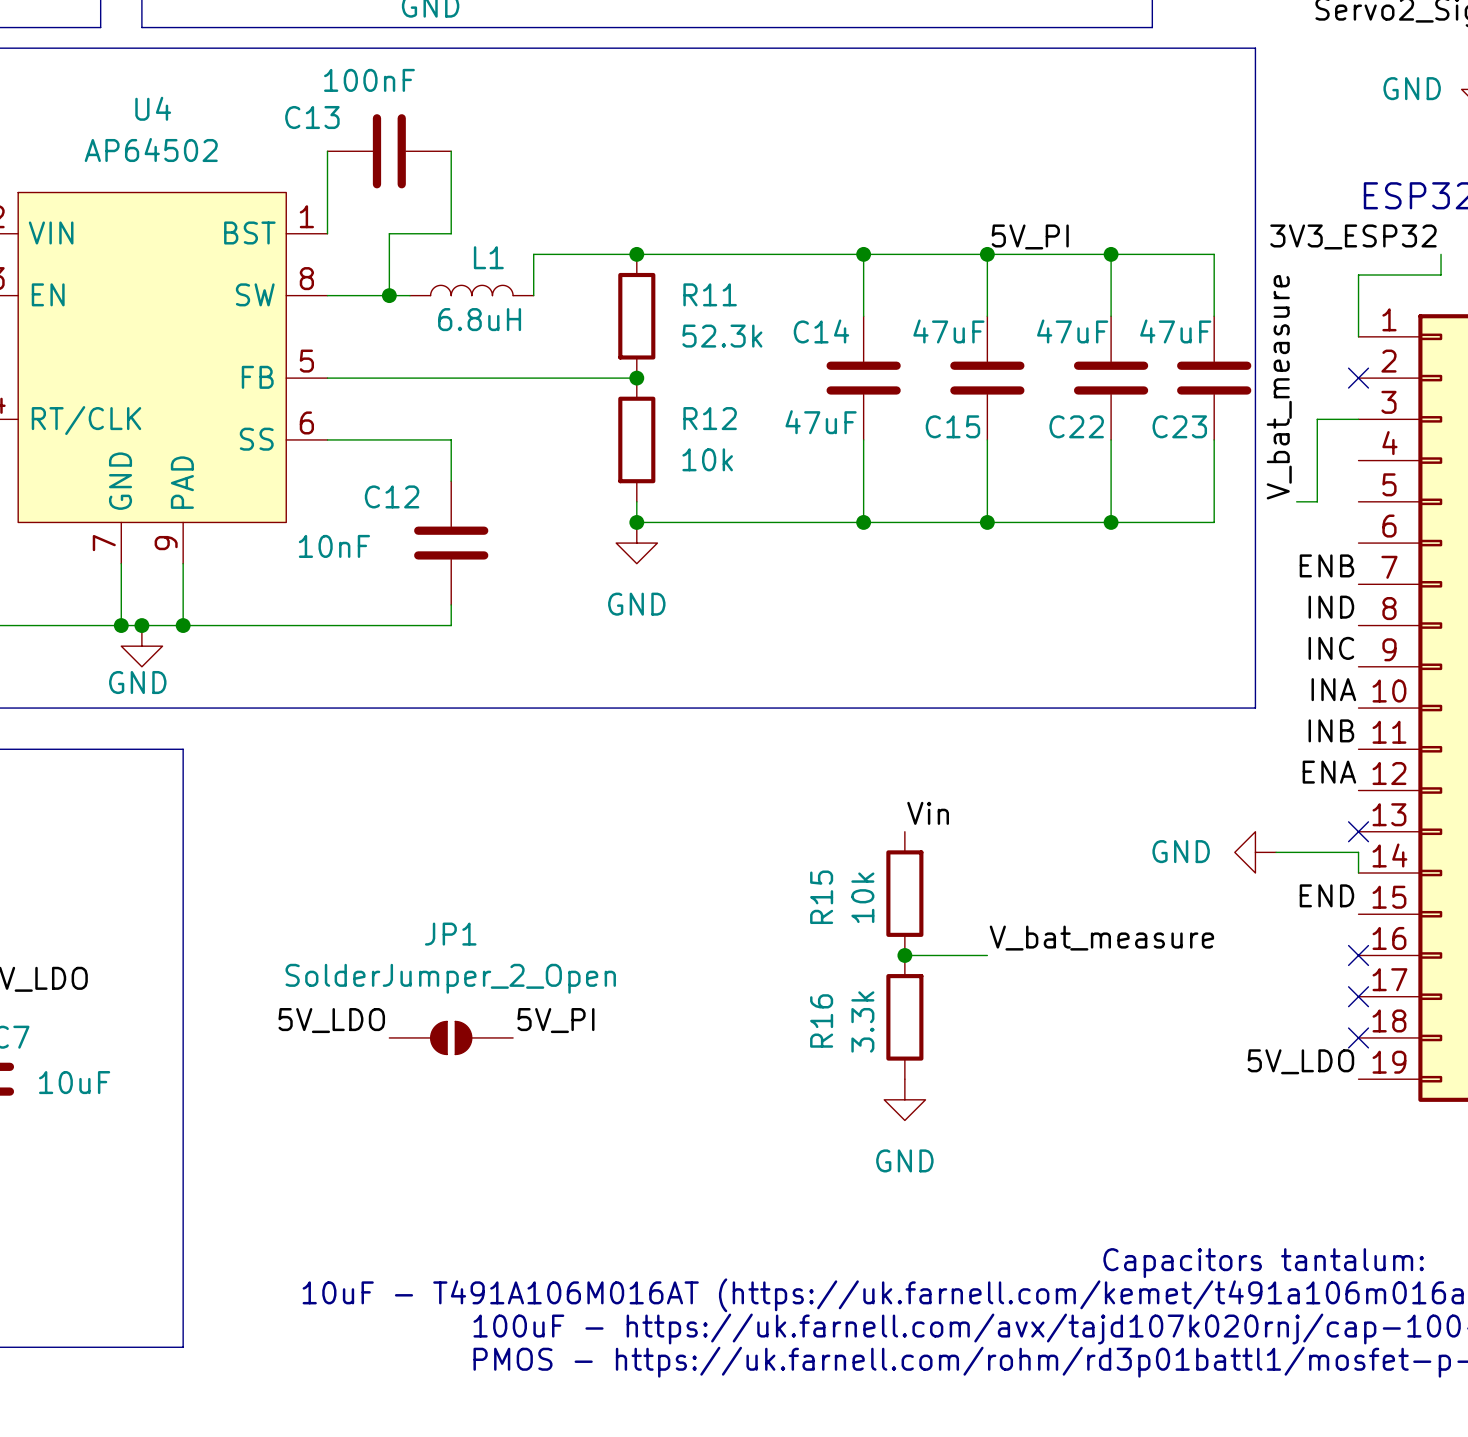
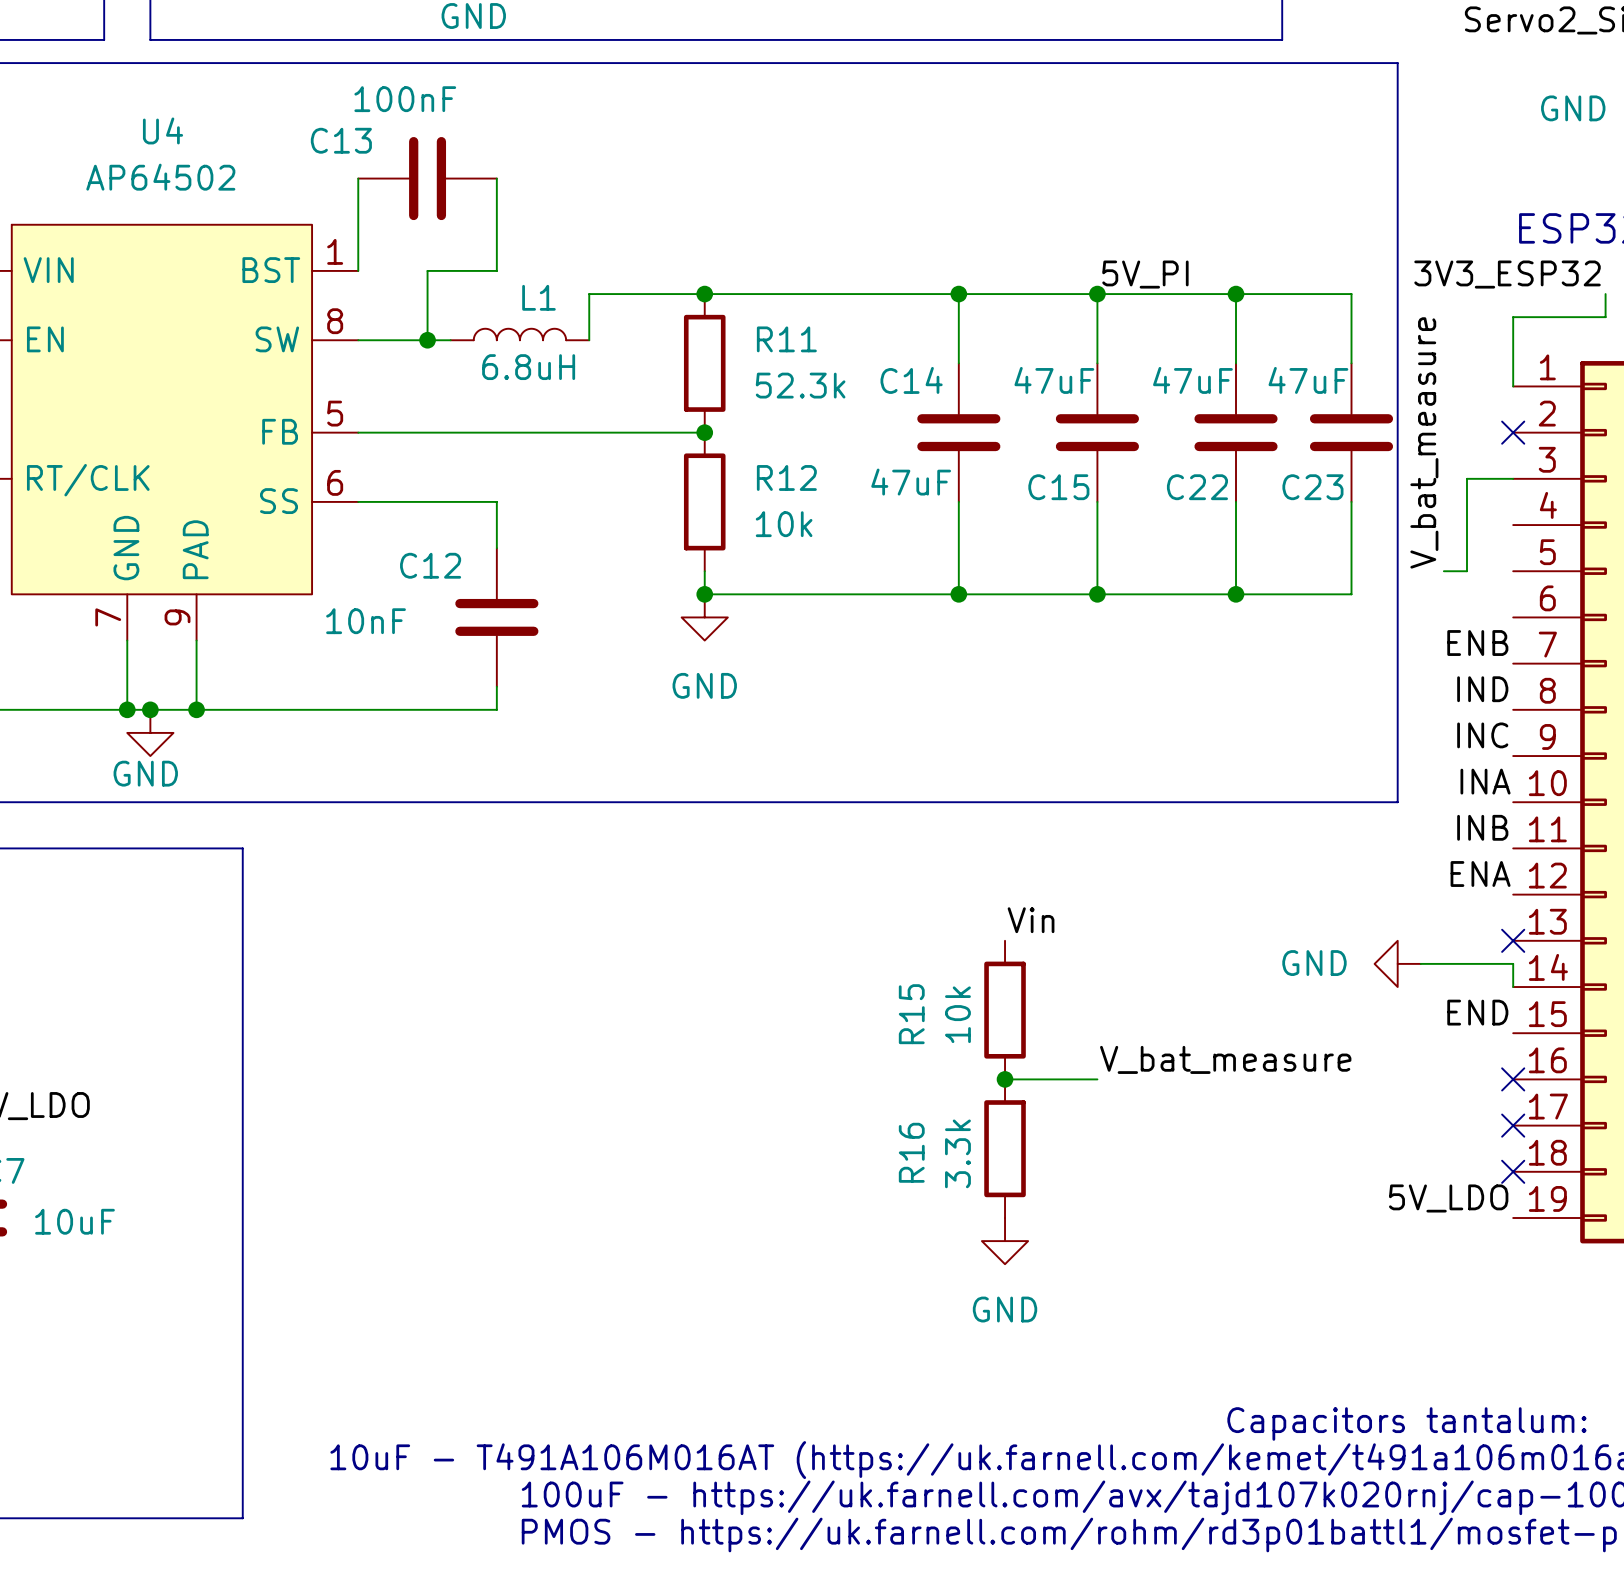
line: (183, 749) (183, 1347) -> (196, 848) (242, 848) (242, 1518) (196, 1518)
label: 5V_LDO (331, 1020) -> none
label: 5V_PI (555, 1020) -> none
JP1: SolderJumper_2_Open (451, 1037) -> none

